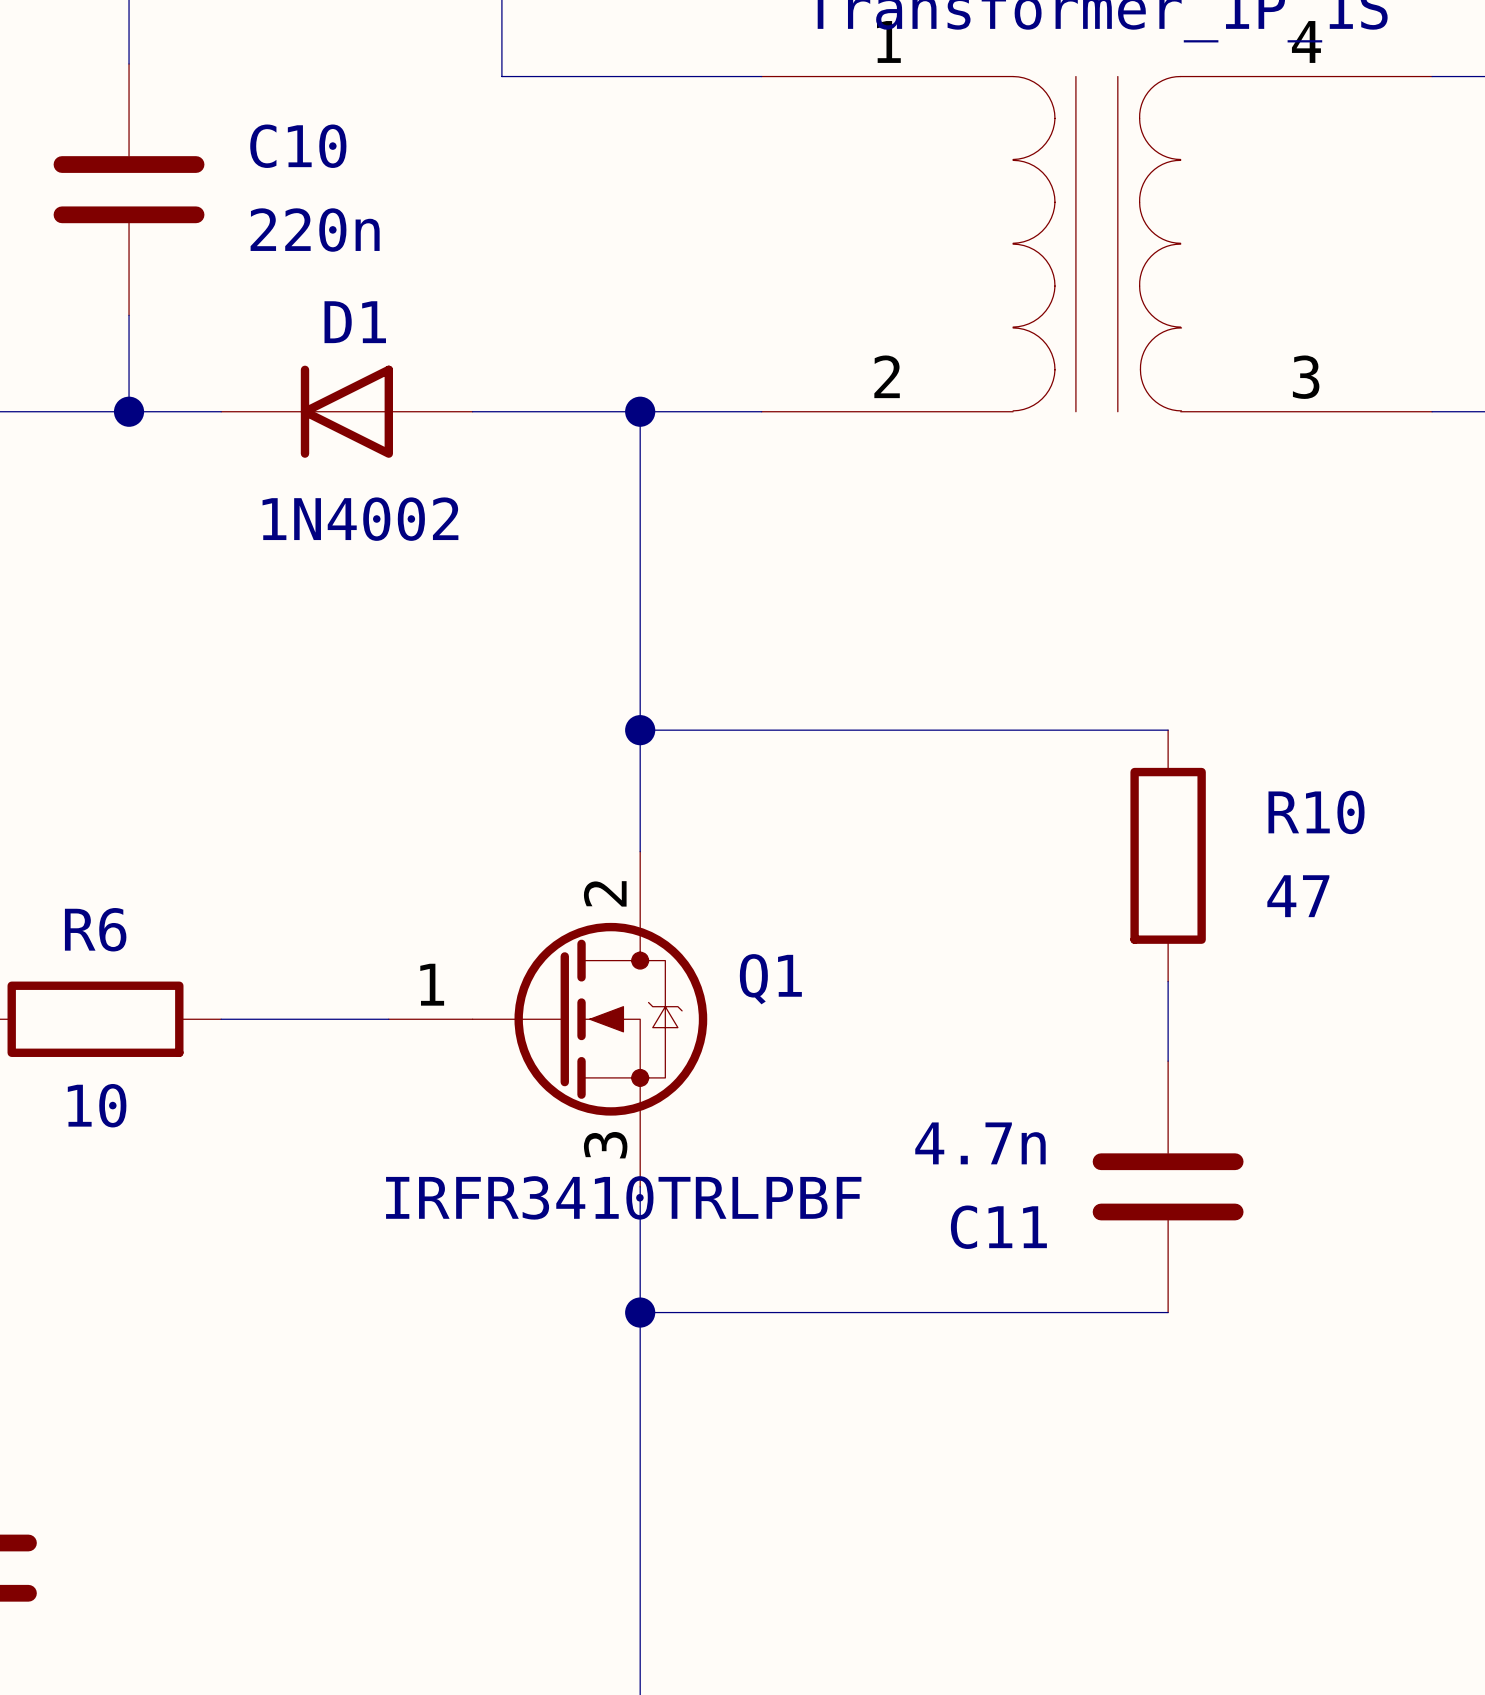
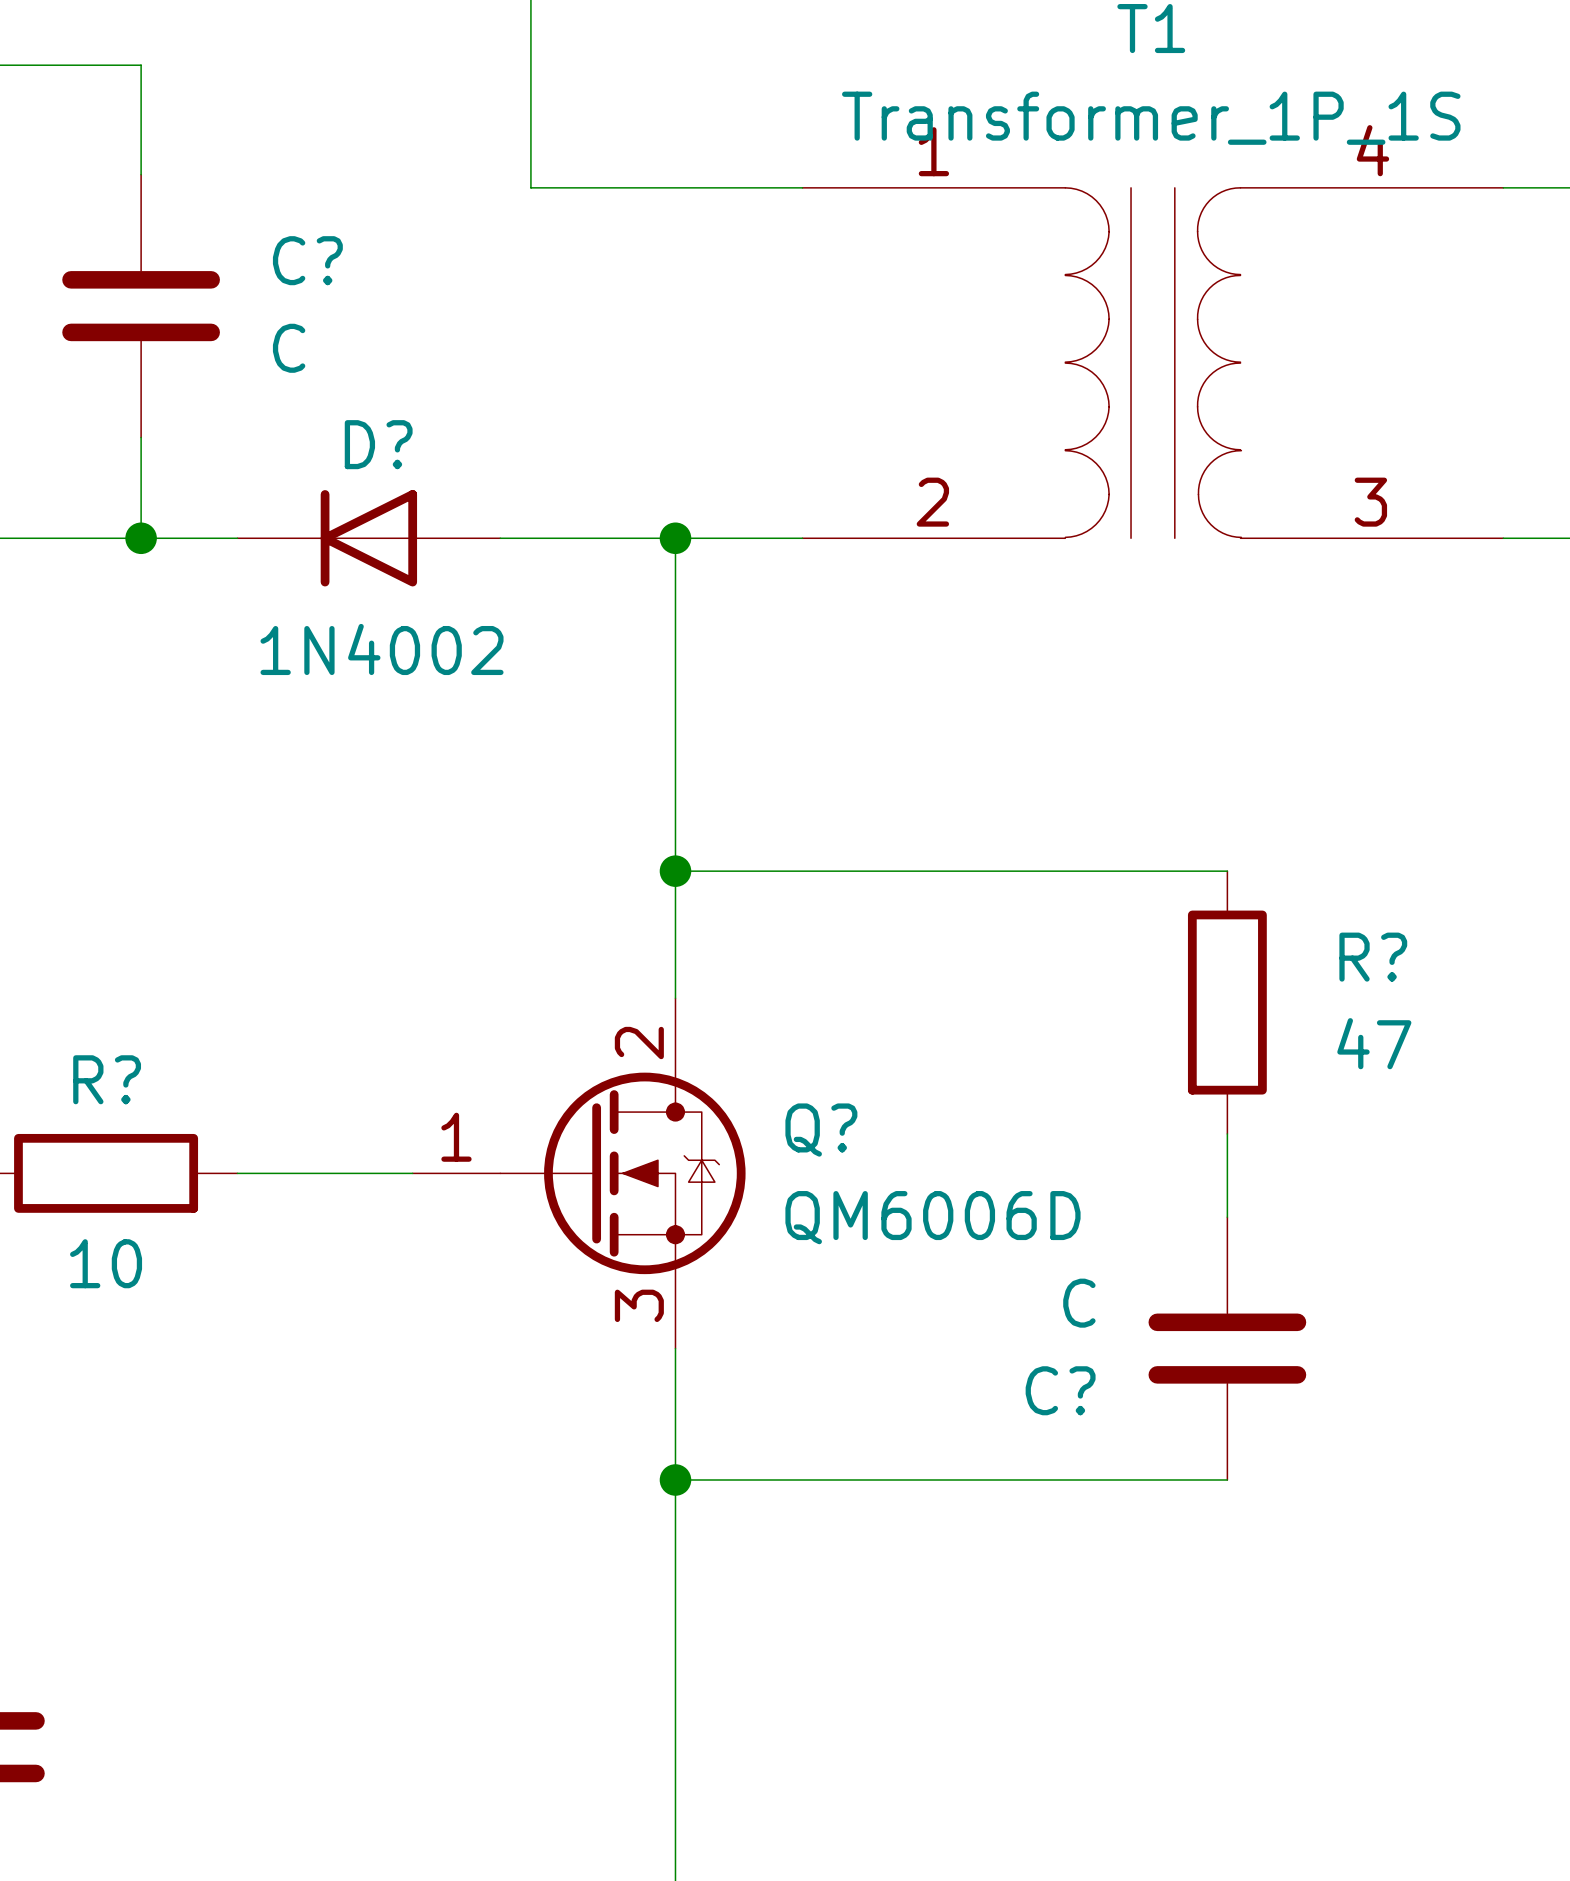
C10 name: C10 (298, 146) -> C? (307, 260)
C10 value: 220n (315, 230) -> C (289, 348)
D1 name: D1 (355, 322) -> D? (378, 444)
R10 name: R10 (1316, 812) -> R? (1373, 957)
R6 name: R6 (95, 929) -> R? (107, 1079)
Q1 name: Q1 (770, 979) -> Q? (821, 1130)
C11 value: 4.7n (980, 1143) -> C (1079, 1303)
Q1 value: IRFR3410TRLPBF (623, 1197) -> QM6006D (932, 1217)
C11 name: C11 (998, 1227) -> C? (1060, 1390)

